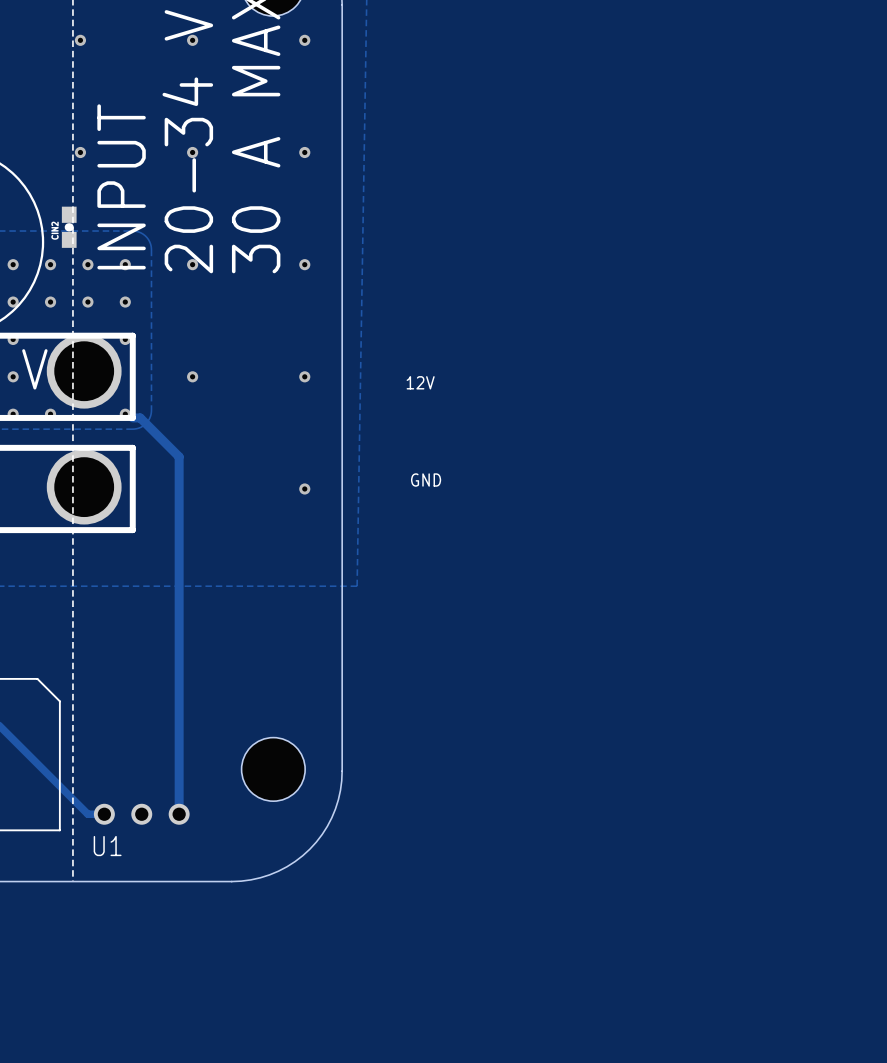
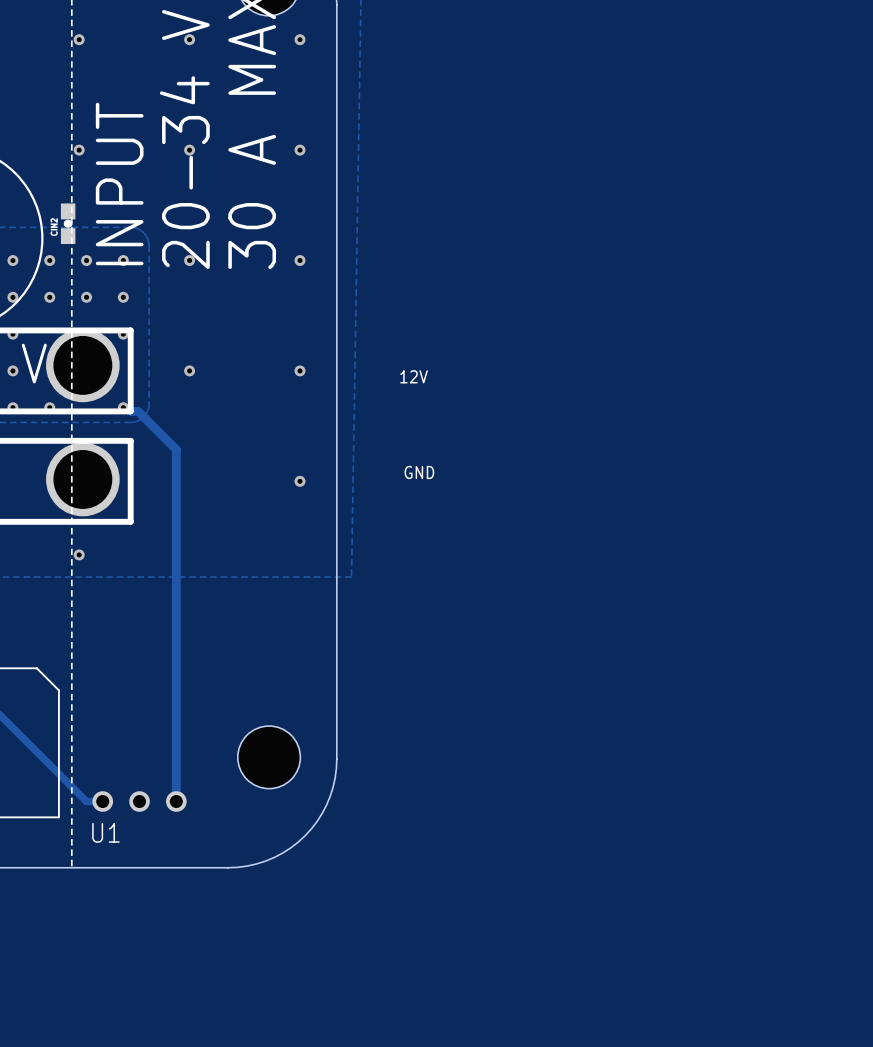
via: none -> (79, 554)

